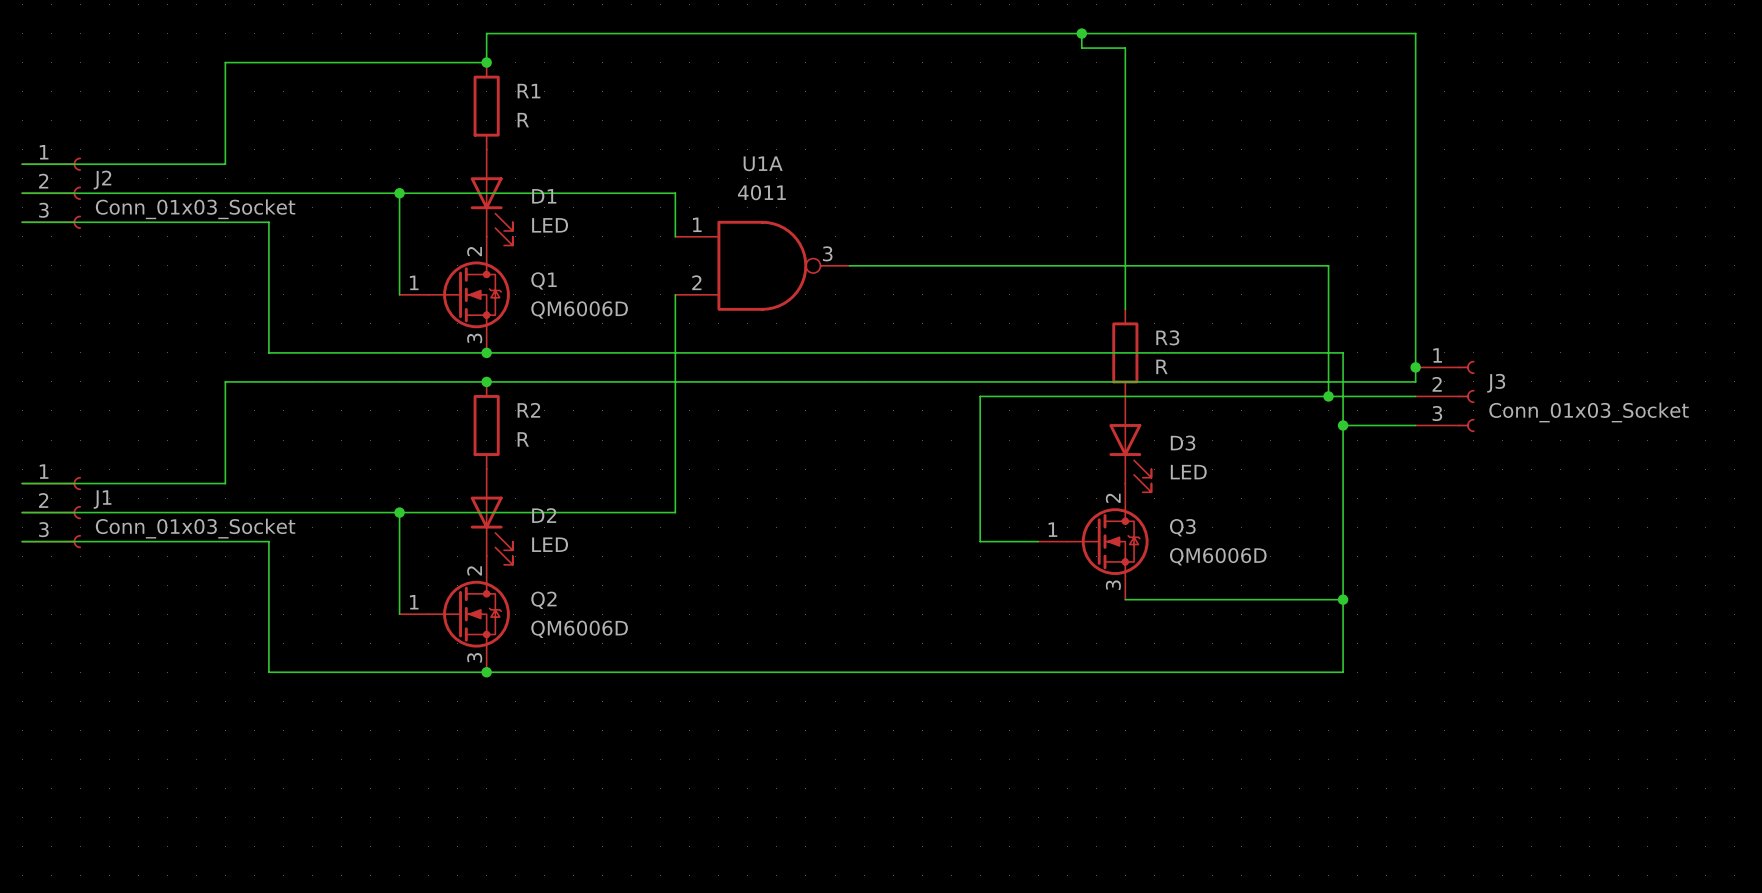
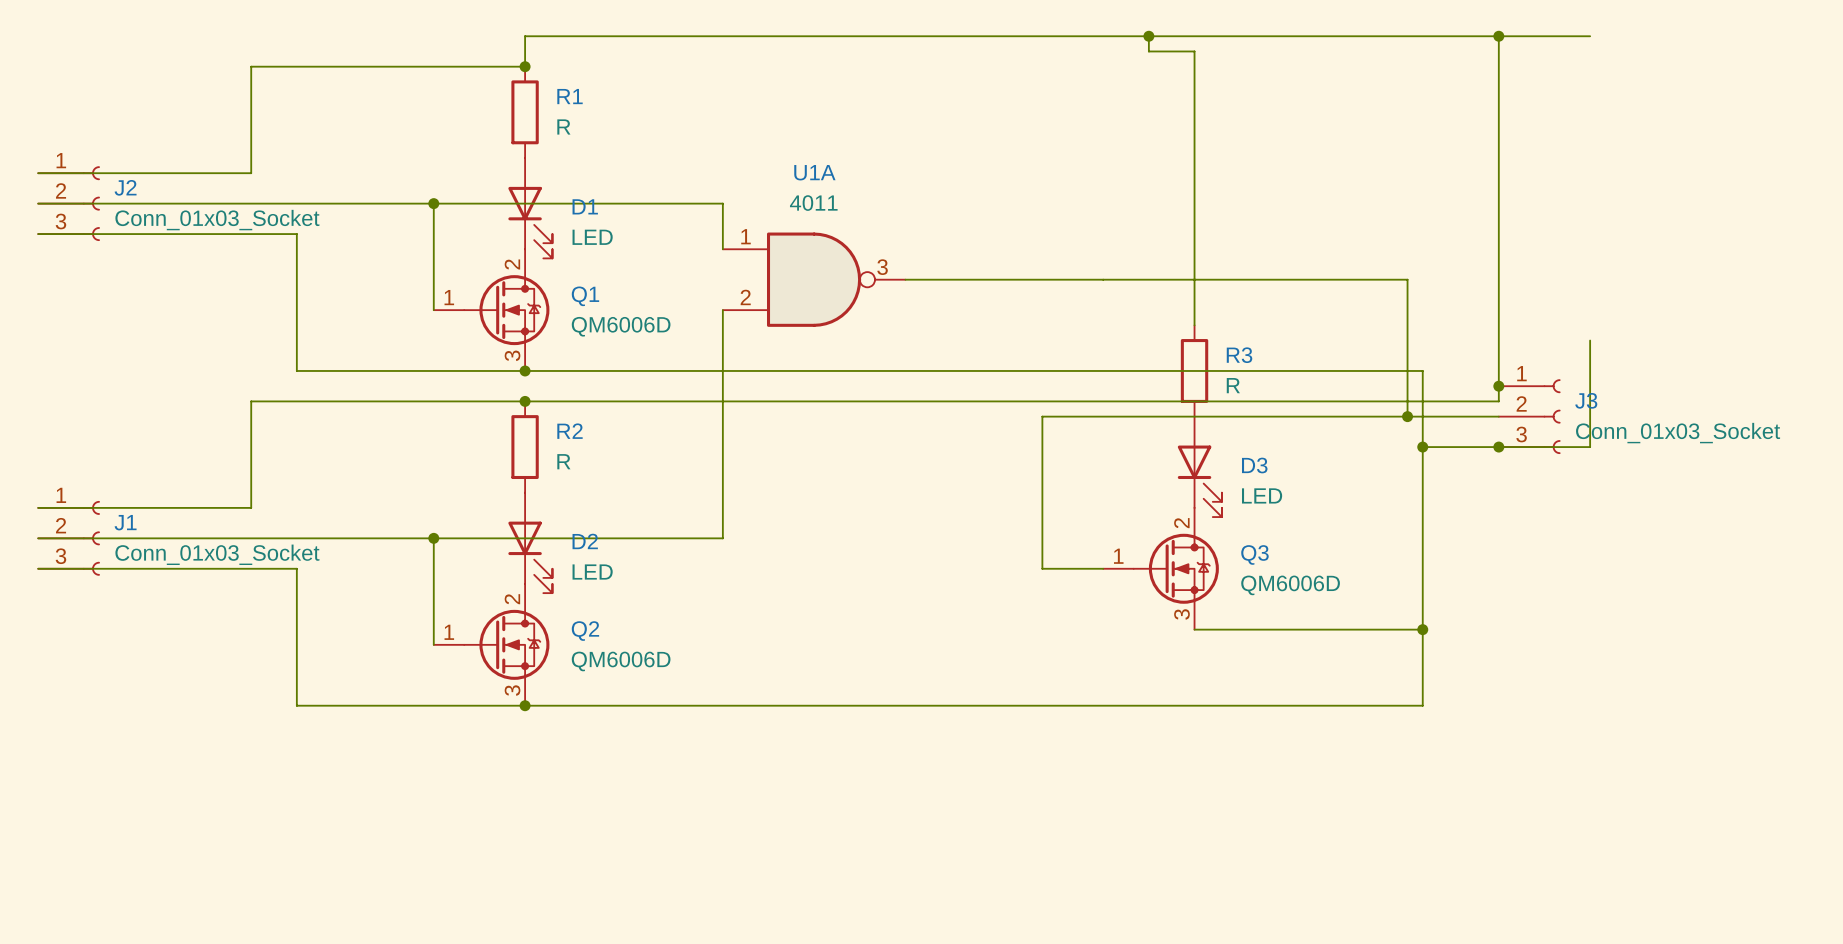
wire: none -> (1498, 36) (1590, 36)
junction: none -> (1498, 36)
wire: none -> (1590, 340) (1590, 447) (1498, 447)
junction: none -> (1498, 447)

